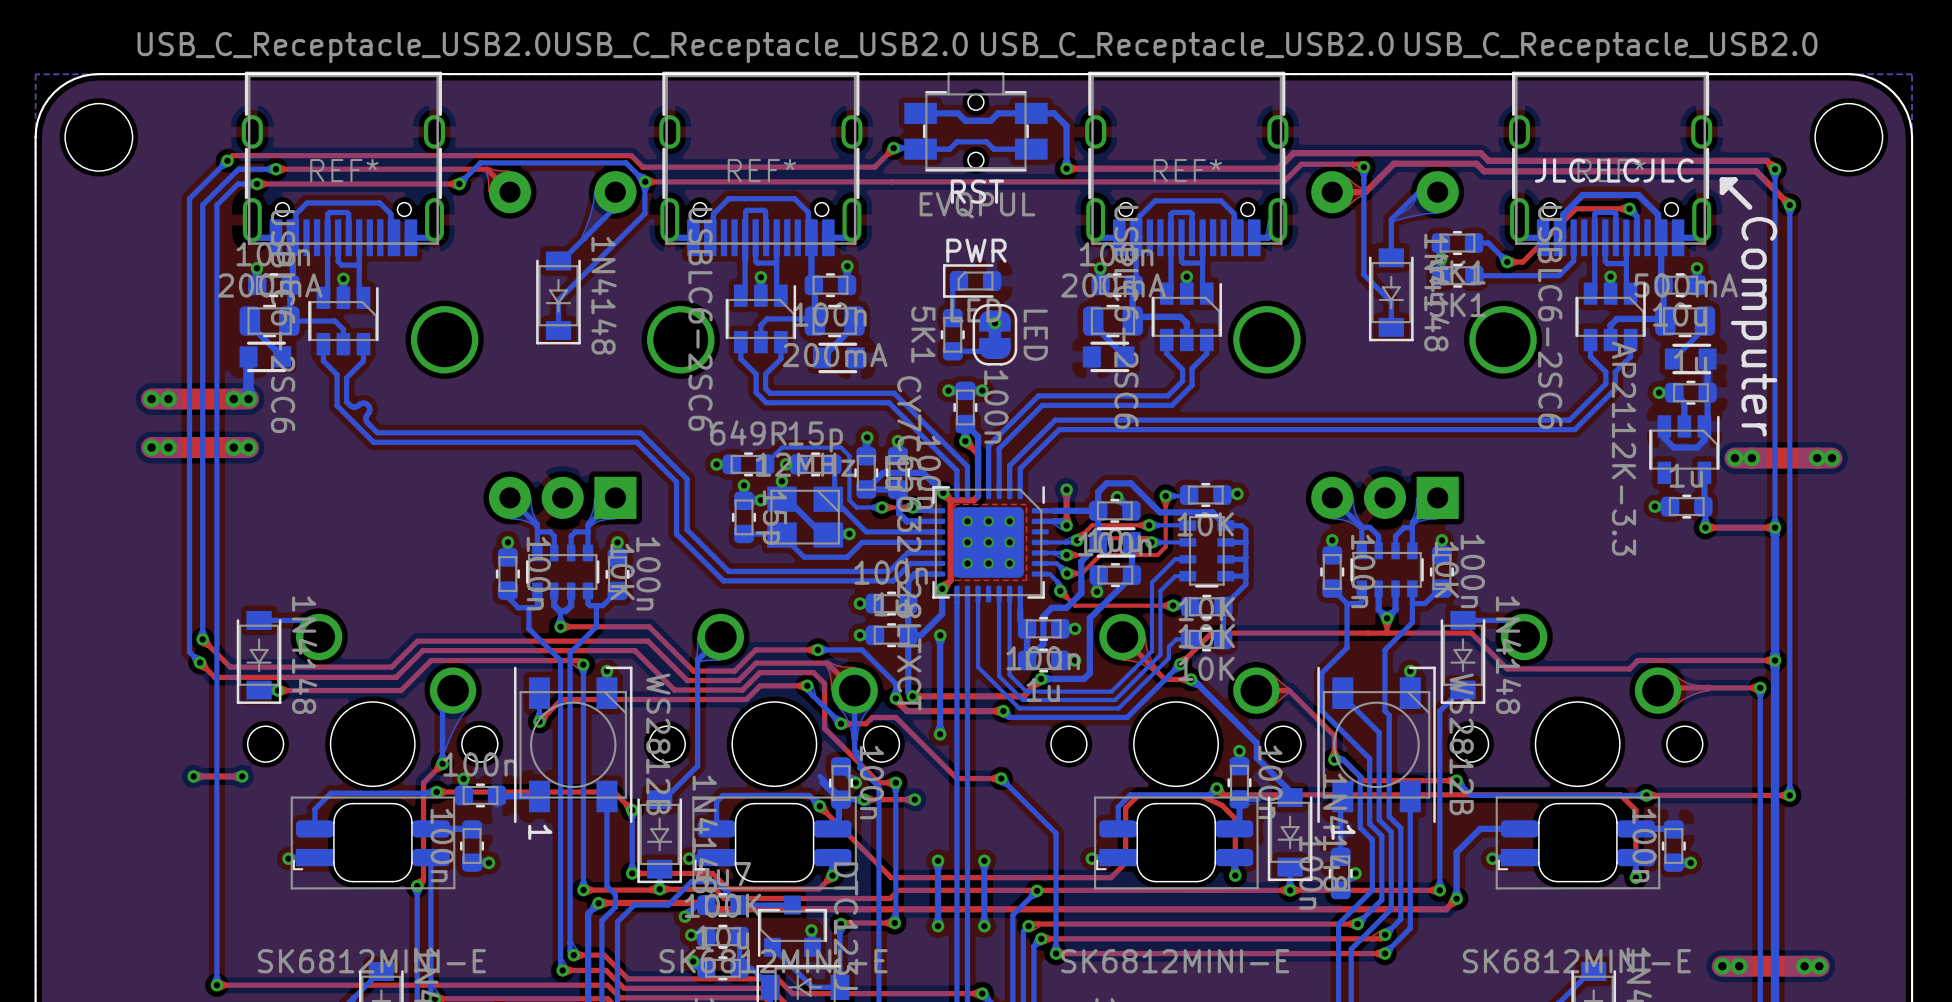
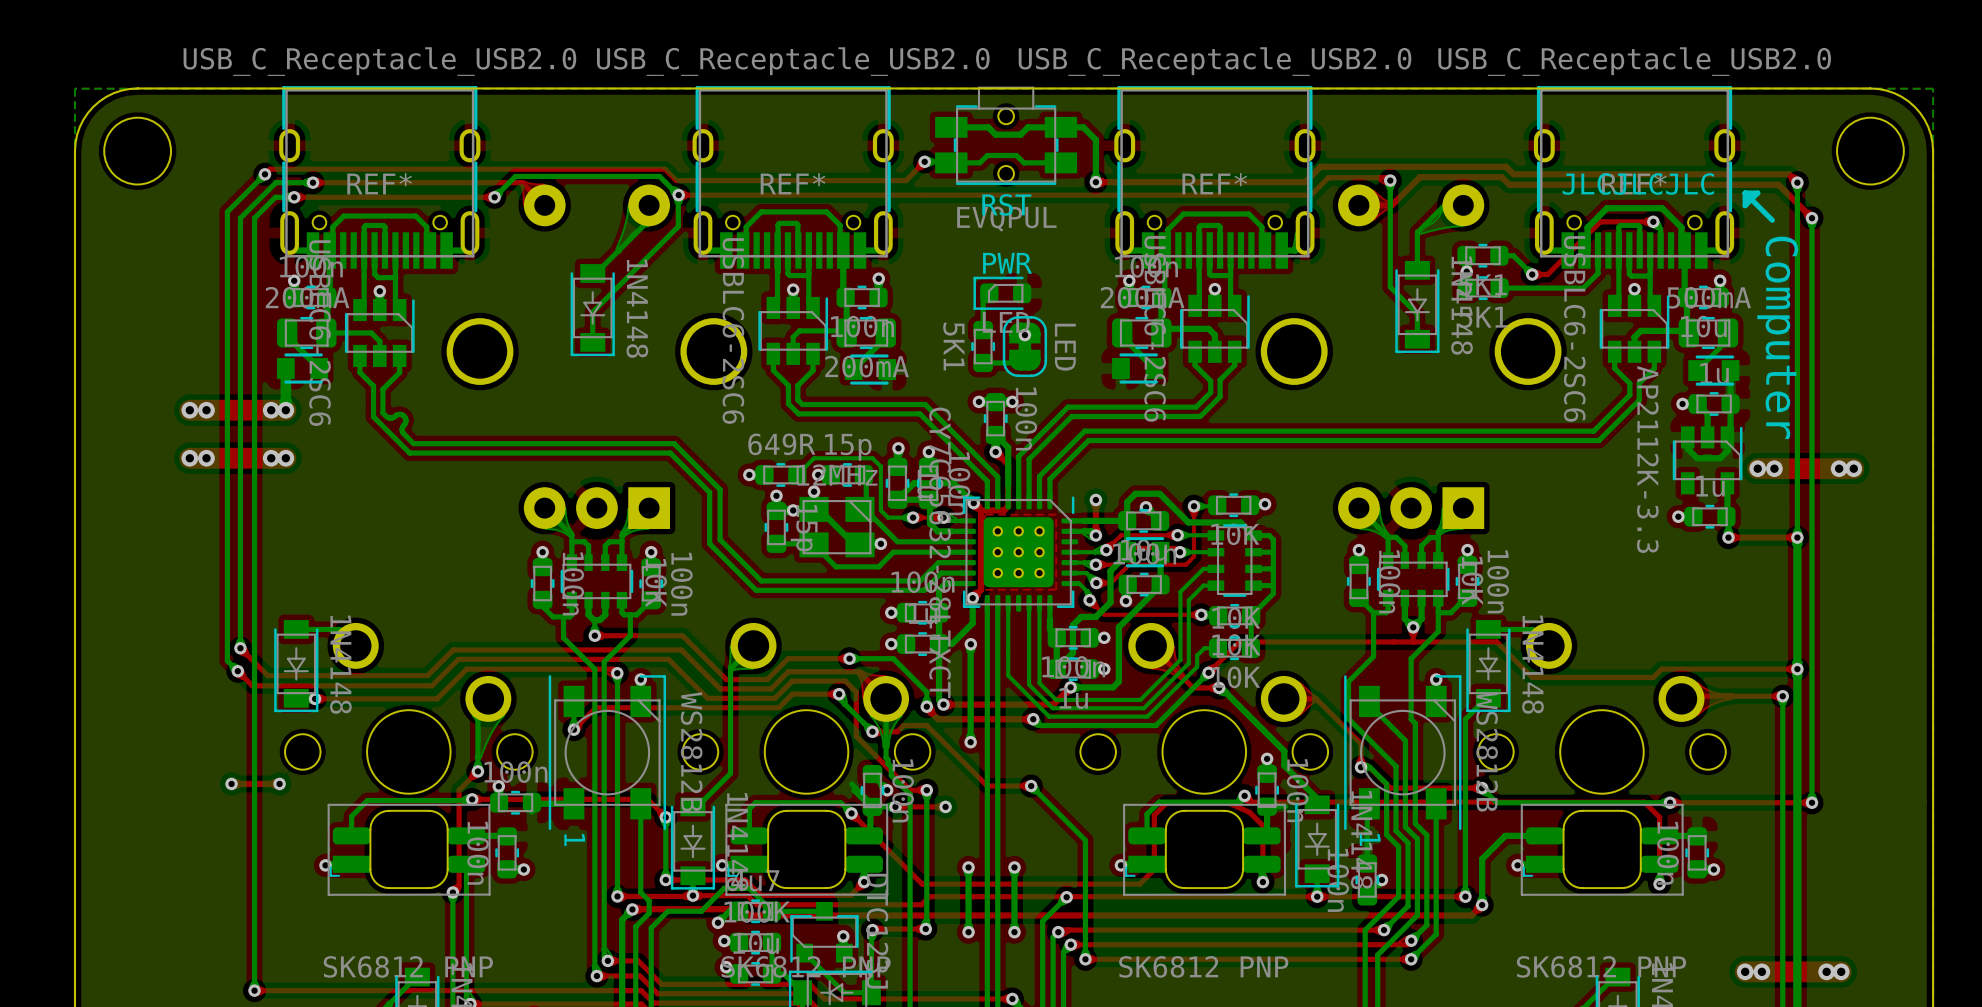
drawing shape: [257, 796, 486, 974] -> [323, 803, 493, 978]
drawing shape: [659, 796, 888, 974] -> [721, 803, 891, 978]
drawing shape: [1061, 796, 1290, 974] -> [1119, 803, 1289, 978]
drawing shape: [1462, 796, 1691, 974] -> [1516, 803, 1687, 978]

